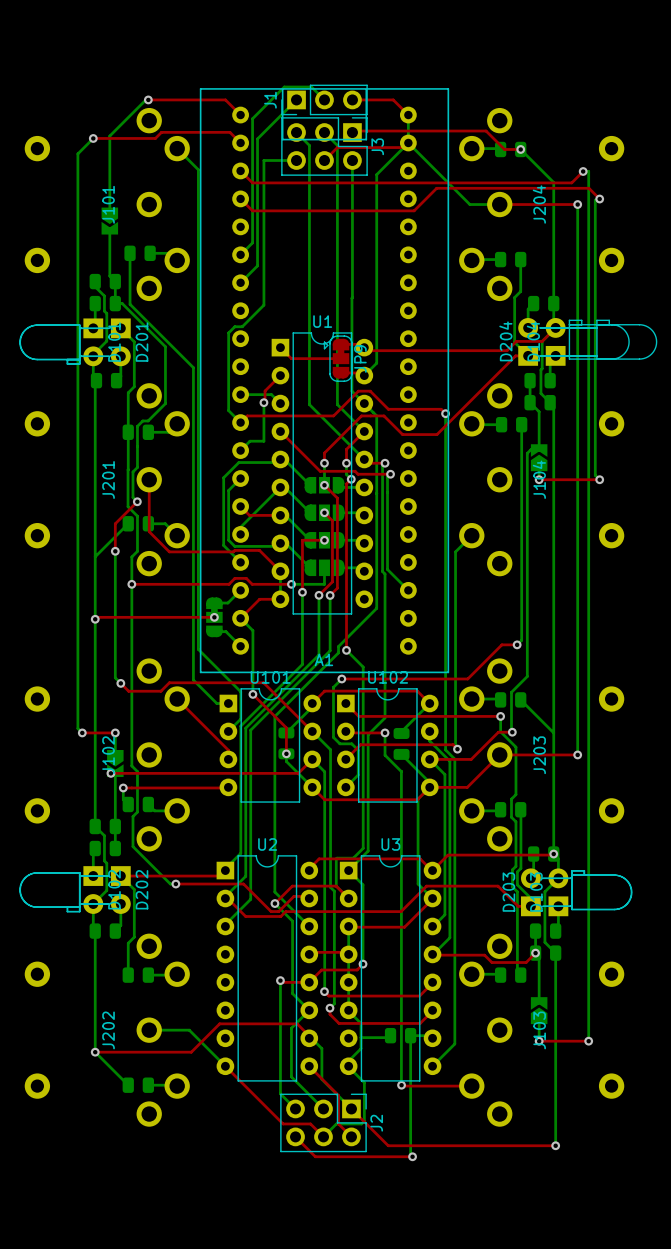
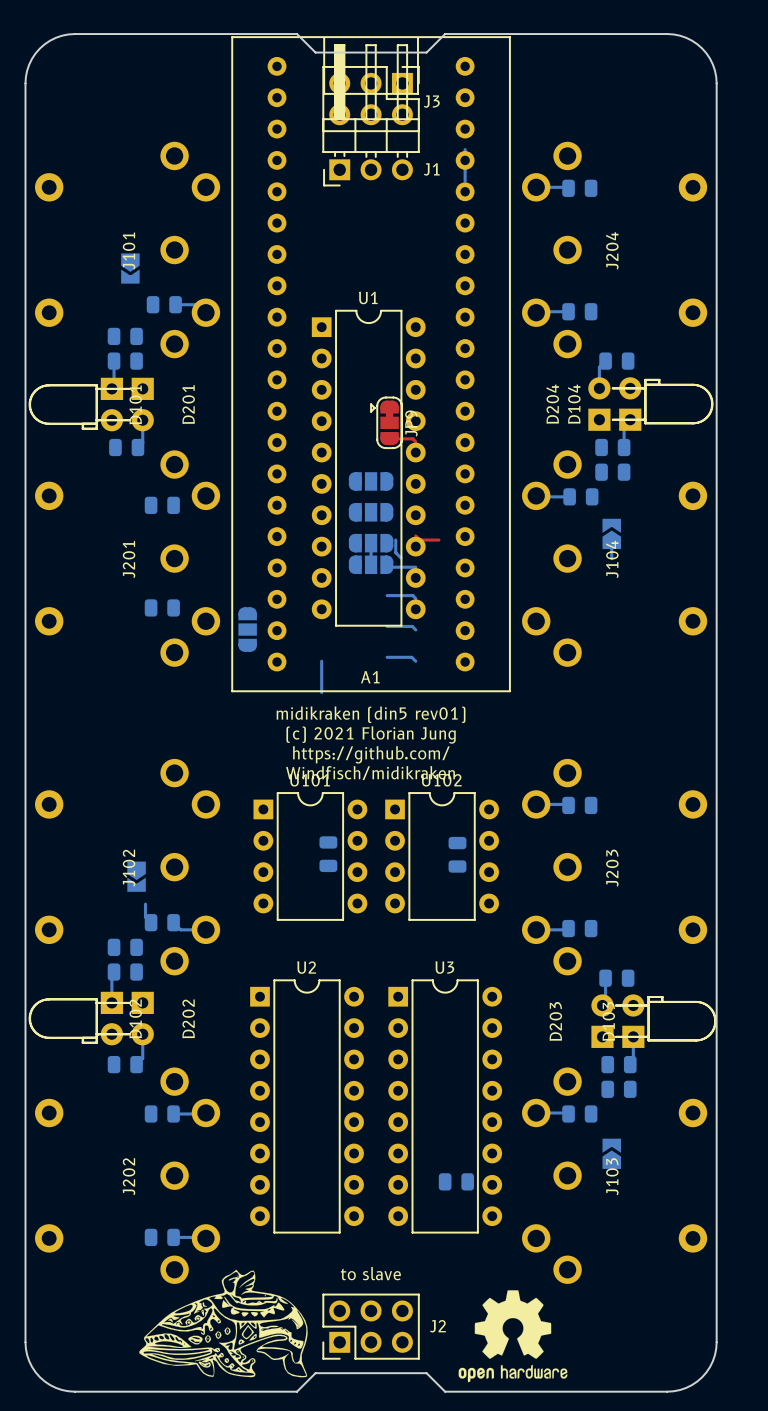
board edge: none -> (74, 34) (297, 34) (315, 52) (426, 52) (445, 34) (667, 34) (680, 35) (691, 40) (706, 53) (712, 64) (716, 83) (716, 1342) (714, 1355) (710, 1367) (697, 1381) (686, 1387) (667, 1391) (445, 1391) (426, 1373) (315, 1373) (297, 1391) (74, 1391) (62, 1390) (50, 1385) (35, 1372) (29, 1361) (25, 1342) (25, 83) (29, 64) (39, 48) (55, 37) (74, 34)
J1 footprint: [281, 84, 368, 116] -> [322, 44, 420, 187]
bottom track: (148, 99) (145, 99) (109, 136) (109, 213) -> none
top track: (148, 99) (225, 99) (240, 115) -> none
via: (148, 99) -> none
bottom track: (296, 99) (257, 138) (257, 265) (240, 282) -> none
bottom track: (324, 99) (311, 87) (284, 87) (252, 118) (252, 242) (240, 254) -> none
top track: (352, 99) (393, 99) (408, 115) -> none
J1 name position: J1 (270, 100) -> J1 (431, 169)
bottom track: (296, 132) (309, 145) (309, 404) (364, 459) -> none
bottom track: (324, 132) (337, 145) (337, 404) (364, 431) -> none
top track: (352, 132) (486, 131) (504, 149) (520, 149) -> none
bottom track: (93, 138) (77, 153) (77, 728) (82, 732) -> none
top track: (93, 138) (155, 138) (161, 132) (229, 132) (240, 142) -> none
via: (93, 138) -> none
top track: (408, 142) (403, 147) (337, 147) (324, 160) -> none
J3 position: (324, 146) -> (371, 99)
J3 name rotation: 0° (377, 146) -> 90° clockwise (431, 101)
bottom track: (177, 148) (198, 169) (198, 649) (240, 691) (240, 719) (228, 731) -> none
bottom track: (520, 149) (553, 182) (553, 326) (555, 327) (542, 341) (540, 369) (540, 393) (553, 406) (553, 732) -> none
via: (520, 149) -> none
bottom track: (296, 160) (263, 160) (263, 305) (242, 326) (234, 326) (228, 332) (228, 410) (240, 422) -> none
bottom track: (352, 160) (351, 391) (376, 415) (376, 608) (338, 646) (338, 652) (274, 716) (274, 892) (309, 926) -> none
top track: (240, 170) (252, 182) (571, 182) (583, 171) -> none
bottom track: (583, 171) (588, 171) (588, 1041) -> none
via: (583, 171) -> none
top track: (240, 198) (252, 210) (414, 210) (436, 188) (588, 188) (599, 199) -> none
bottom track: (599, 199) (595, 200) (595, 475) (599, 479) -> none
via: (599, 199) -> none
bottom track: (499, 204) (469, 204) (408, 142) (376, 174) (376, 363) (364, 375) -> none
top track: (499, 204) (577, 204) -> none
bottom track: (577, 204) (577, 754) -> none
via: (577, 204) -> none
bottom track: (109, 229) (109, 276) (115, 281) (115, 303) (122, 303) (165, 346) (165, 403) (148, 420) (142, 420) (137, 426) (137, 467) (132, 471) (132, 497) (137, 501) -> none
bottom track: (130, 253) (130, 304) (193, 367) (193, 680) (216, 703) (228, 703) -> none
bottom track: (520, 259) (520, 291) (514, 297) (514, 342) (528, 355) -> none
bottom track: (95, 281) (95, 286) (104, 296) (104, 311) (106, 313) (106, 341) (93, 354) (93, 377) (96, 380) (95, 826) (104, 835) (104, 860) (106, 863) (106, 890) (93, 904) (93, 929) (95, 931) (95, 1052) (128, 1085) -> none
D104 footprint: [545, 318, 658, 366] -> [619, 377, 713, 431]
top track: (555, 327) (542, 341) (516, 341) (507, 350) (367, 350) (361, 344) (341, 344) -> none
bottom track: (120, 328) (134, 341) (134, 386) (128, 392) (128, 469) (128, 506) (137, 516) (137, 551) (131, 556) (131, 765) (137, 771) (137, 812) (132, 816) (132, 846) (170, 884) (175, 884) -> none
D204 name position: D204 (505, 341) -> D204 (552, 404)
D201 name position: D201 (141, 342) -> D201 (188, 404)
top track: (280, 347) (291, 358) (341, 358) -> none
top track: (528, 355) (515, 355) (436, 434) (402, 434) (384, 415) (361, 415) (324, 453) (324, 463) -> none
top track: (280, 375) (265, 391) (263, 402) -> none
A1 position: (324, 380) -> (371, 364)
bottom track: (530, 380) (530, 402) (539, 411) (539, 449) (530, 449) (527, 453) (527, 676) (511, 692) (512, 732) -> none
bottom track: (240, 394) (271, 394) (280, 403) -> none
bottom track: (263, 402) (263, 441) (249, 441) (240, 450) -> none
via: (263, 402) -> none
part: none -> (371, 481)
bottom track: (445, 413) (445, 749) (454, 759) (454, 1043) (432, 1066) -> none
top track: (445, 413) (441, 409) (388, 409) (370, 391) (358, 391) (333, 415) (247, 415) (240, 422) -> none
via: (445, 413) -> none
bottom track: (177, 423) (168, 432) (148, 432) -> none
bottom track: (521, 424) (521, 640) (517, 644) -> none
top track: (280, 431) (320, 471) (390, 474) -> none
top track: (364, 431) (346, 449) (346, 463) -> none
part: none -> (371, 512)
via: (324, 463) -> none
via: (346, 463) -> none
bottom track: (385, 463) (382, 465) (385, 717) (368, 734) (368, 851) (348, 870) (363, 884) (363, 964) -> none
via: (385, 463) -> none
part: none -> (371, 543)
U1 position: (322, 473) -> (368, 468)
bottom track: (390, 474) (387, 477) (387, 569) (408, 590) -> none
via: (390, 474) -> none
bottom track: (240, 478) (228, 490) (228, 540) (234, 546) (277, 546) (280, 543) (285, 543) (310, 567) -> none
top track: (149, 479) (149, 531) (169, 551) (259, 550) (280, 571) -> none
top track: (351, 479) (346, 484) (346, 650) -> none
via: (351, 479) -> none
top track: (539, 479) (599, 479) -> none
via: (539, 479) -> none
via: (599, 479) -> none
bottom track: (310, 485) (284, 459) (280, 459) (277, 462) (238, 462) (223, 477) (223, 545) (240, 562) -> none
top track: (324, 485) (337, 498) (337, 588) (330, 595) -> none
via: (324, 485) -> none
top track: (137, 501) (115, 523) (115, 551) -> none
via: (137, 501) -> none
top track: (240, 506) (249, 515) (285, 515) -> none
bottom track: (310, 512) (284, 487) (280, 487) (240, 527) (240, 534) -> none
top track: (324, 512) (332, 520) (332, 581) (318, 595) -> none
part: (324, 512) -> none
via: (324, 512) -> none
bottom track: (280, 515) (285, 515) (310, 540) -> none
bottom track: (128, 523) (95, 556) -> none
bottom track: (148, 523) (165, 523) (177, 535) -> none
bottom track: (471, 535) (455, 551) (455, 747) (457, 749) -> none
top track: (324, 540) (302, 540) (302, 592) -> none
part: (324, 540) -> none
via: (324, 540) -> none
part: none -> (247, 629)
bottom track: (115, 551) (115, 677) (120, 683) -> none
via: (115, 551) -> none
bottom track: (324, 567) (324, 584) (291, 584) -> none
part: (324, 567) -> none
top track: (131, 584) (228, 584) (234, 578) (246, 578) (252, 584) (291, 584) -> none
via: (131, 584) -> none
via: (291, 584) -> none
bottom track: (240, 590) (227, 603) (214, 603) -> none
bottom track: (302, 592) (302, 664) (240, 726) (240, 853) (225, 868) -> none
via: (302, 592) -> none
bottom track: (318, 595) (318, 654) (245, 728) (245, 876) (225, 896) -> none
via: (318, 595) -> none
bottom track: (330, 595) (330, 650) (250, 730) (250, 899) (225, 924) -> none
via: (330, 595) -> none
top track: (280, 599) (259, 599) (240, 618) -> none
top track: (214, 617) (97, 617) (95, 619) -> none
part: (214, 617) -> none
via: (214, 617) -> none
bottom track: (240, 618) (252, 630) (252, 694) -> none
via: (95, 619) -> none
text: none -> midikraken (din5 rev01) (371, 714)
bottom track: (214, 631) (225, 631) (240, 646) -> none
text: none -> (c) 2021 Florian Jung (371, 735)
top track: (517, 644) (501, 644) (467, 678) (341, 678) -> none
via: (517, 644) -> none
bottom track: (346, 650) (363, 667) (363, 848) (353, 858) (336, 858) (336, 886) (348, 898) -> none
via: (346, 650) -> none
text: none -> https://github.com/ (371, 754)
text: none -> Windfisch/midikraken (370, 773)
bottom track: (341, 678) (333, 687) (333, 737) (339, 743) (351, 743) (358, 750) (358, 774) (345, 787) -> none
via: (341, 678) -> none
top track: (120, 683) (128, 691) (160, 691) (169, 682) (263, 682) (312, 731) -> none
via: (120, 683) -> none
top track: (252, 694) (286, 727) (286, 753) -> none
via: (252, 694) -> none
top track: (177, 699) (228, 750) (228, 759) -> none
bottom track: (520, 699) (553, 732) -> none
bottom track: (312, 703) (312, 707) (286, 732) -> none
top track: (312, 703) (324, 691) (417, 691) (429, 703) -> none
top track: (345, 703) (358, 716) (500, 716) -> none
bottom track: (429, 703) (401, 733) -> none
bottom track: (500, 716) (500, 731) (515, 747) (515, 794) (511, 799) (511, 817) (515, 821) (515, 866) (512, 869) (512, 886) (517, 891) (517, 971) (520, 975) -> none
via: (500, 716) -> none
bottom track: (312, 731) (330, 749) (330, 887) (334, 891) (334, 1003) (329, 1008) -> none
top track: (345, 731) (385, 732) -> none
bottom track: (429, 731) (429, 741) (449, 761) (449, 937) (432, 955) -> none
top track: (82, 732) (115, 732) -> none
via: (82, 732) -> none
bottom track: (115, 732) (115, 755) -> none
via: (115, 732) -> none
bottom track: (385, 732) (385, 755) (401, 771) (401, 1085) -> none
via: (385, 732) -> none
top track: (512, 732) (498, 732) (471, 759) (429, 759) -> none
via: (512, 732) -> none
bottom track: (553, 732) (553, 854) (558, 858) (558, 878) (544, 891) (544, 942) (555, 953) (555, 1145) -> none
top track: (457, 749) (453, 744) (360, 744) (345, 759) -> none
via: (457, 749) -> none
bottom track: (286, 753) (286, 761) (312, 787) -> none
via: (286, 753) -> none
bottom track: (401, 754) (429, 782) (429, 787) (418, 799) (418, 884) (432, 898) -> none
top track: (577, 754) (499, 754) (467, 787) (429, 787) (417, 799) (324, 799) (312, 787) -> none
via: (577, 754) -> none
bottom track: (312, 759) (324, 771) (324, 991) -> none
top track: (312, 759) (298, 773) (110, 773) -> none
bottom track: (429, 759) (444, 774) (444, 914) (432, 927) -> none
bottom track: (115, 771) (115, 848) -> none
via: (110, 773) -> none
via: (123, 787) -> none
top track: (228, 787) (123, 787) -> none
bottom track: (520, 809) (520, 868) (517, 871) (517, 884) (530, 898) (530, 906) -> none
top track: (553, 854) (448, 855) (432, 870) -> none
via: (553, 854) -> none
top track: (225, 868) (218, 876) (120, 876) -> none
top track: (309, 868) (319, 858) (420, 858) (432, 871) -> none
bottom track: (120, 876) (134, 889) (134, 937) (128, 943) (128, 975) -> none
top track: (175, 884) (243, 884) (271, 911) (278, 911) (293, 896) (309, 896) -> none
via: (175, 884) -> none
D202 name position: D202 (141, 889) -> D202 (188, 1018)
D203 name position: D203 (508, 892) -> D203 (555, 1021)
top track: (225, 896) (245, 916) (280, 916) (285, 911) (401, 911) (426, 886) (498, 886) (518, 906) (530, 906) -> none
top track: (348, 898) (336, 886) (292, 886) (274, 903) -> none
top track: (432, 899) (404, 927) (348, 927) -> none
bottom track: (274, 903) (292, 921) (292, 993) (309, 1010) (291, 1028) (291, 1076) (323, 1108) -> none
via: (274, 903) -> none
bottom track: (348, 927) (348, 1011) (361, 1023) (361, 1048) (348, 1061) (348, 1067) (364, 1082) (364, 1121) (361, 1123) (336, 1123) (323, 1136) -> none
bottom track: (535, 931) (535, 953) (539, 956) (539, 1002) -> none
top track: (309, 952) (345, 952) (348, 955) -> none
top track: (535, 953) (526, 962) (491, 962) (484, 955) (432, 955) -> none
via: (535, 953) -> none
top track: (363, 964) (357, 970) (321, 970) (309, 982) (282, 982) (280, 980) -> none
via: (363, 964) -> none
bottom track: (280, 980) (280, 1093) (295, 1108) -> none
via: (280, 980) -> none
top track: (432, 983) (419, 996) (328, 996) (324, 991) -> none
via: (324, 991) -> none
top track: (329, 1008) (329, 1014) (339, 1023) (420, 1023) (432, 1011) -> none
via: (329, 1008) -> none
bottom track: (539, 1018) (539, 1041) -> none
bottom track: (149, 1030) (189, 1030) (225, 1066) -> none
bottom track: (390, 1035) (388, 1037) (361, 1037) -> none
bottom track: (309, 1036) (321, 1048) (321, 1079) (351, 1108) -> none
top track: (309, 1036) (297, 1023) (219, 1023) (191, 1052) (95, 1052) -> none
bottom track: (432, 1039) (429, 1035) (410, 1035) (410, 1154) (412, 1156) -> none
top track: (539, 1041) (588, 1041) -> none
via: (539, 1041) -> none
via: (588, 1041) -> none
via: (95, 1052) -> none
top track: (225, 1066) (283, 1123) (310, 1123) (323, 1136) -> none
top track: (309, 1066) (338, 1095) (338, 1123) (351, 1136) -> none
top track: (401, 1085) (471, 1086) -> none
via: (401, 1085) -> none
top track: (351, 1108) (388, 1145) (555, 1145) -> none
drawing: none -> [139, 1269, 308, 1378]
text: none -> to slave (370, 1273)
J2 rotation: 0° (323, 1122) -> 180° (371, 1326)
drawing: none -> [458, 1290, 568, 1383]
top track: (295, 1136) (315, 1156) (412, 1156) -> none
via: (555, 1145) -> none
via: (412, 1156) -> none

